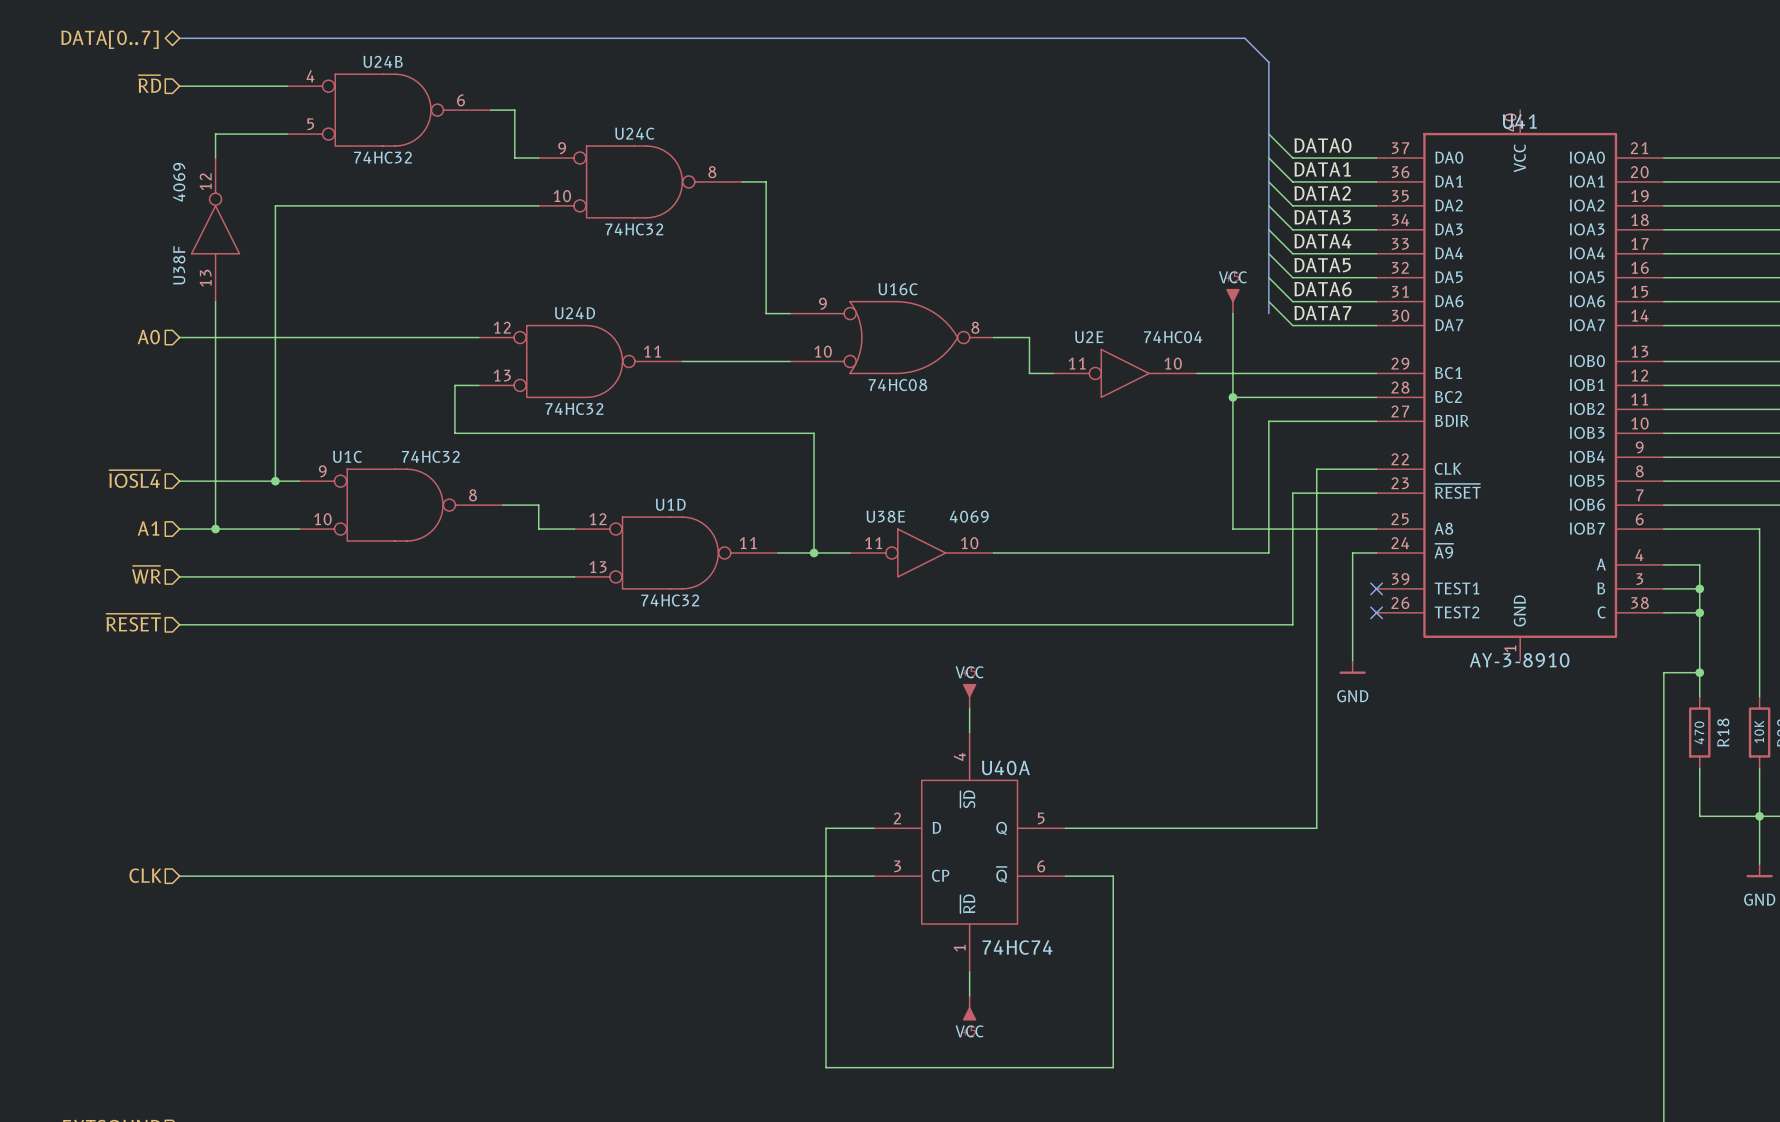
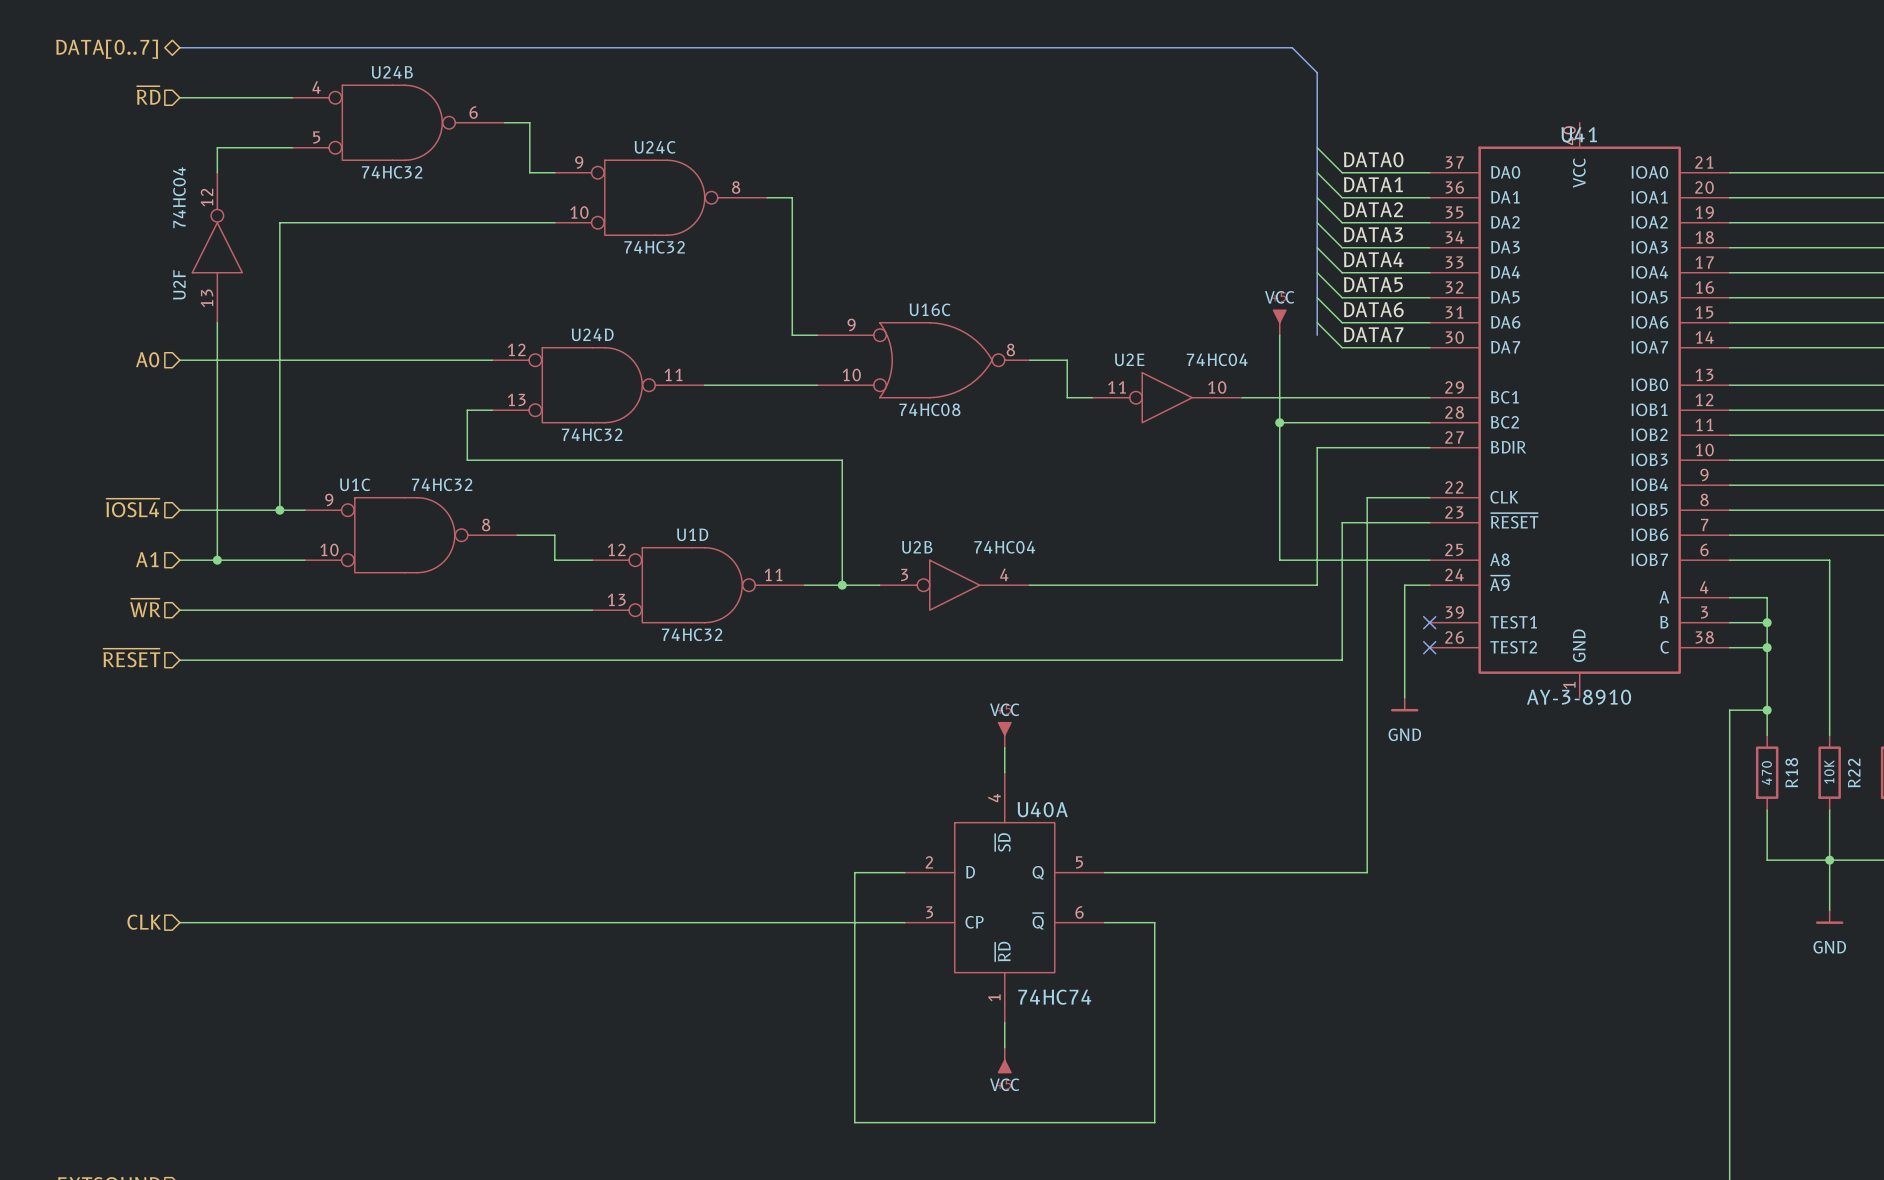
U38F value: 4069 (179, 182) -> 74HC04 (179, 197)
U38F name: U38F (179, 265) -> U2F (179, 284)
U38E name: U38E (885, 516) -> U2B (917, 547)
U38E value: 4069 (969, 516) -> 74HC04 (1004, 547)
U38E pin number: 11 (873, 543) -> 3 (904, 574)
U38E pin number: 10 (969, 543) -> 4 (1004, 574)

